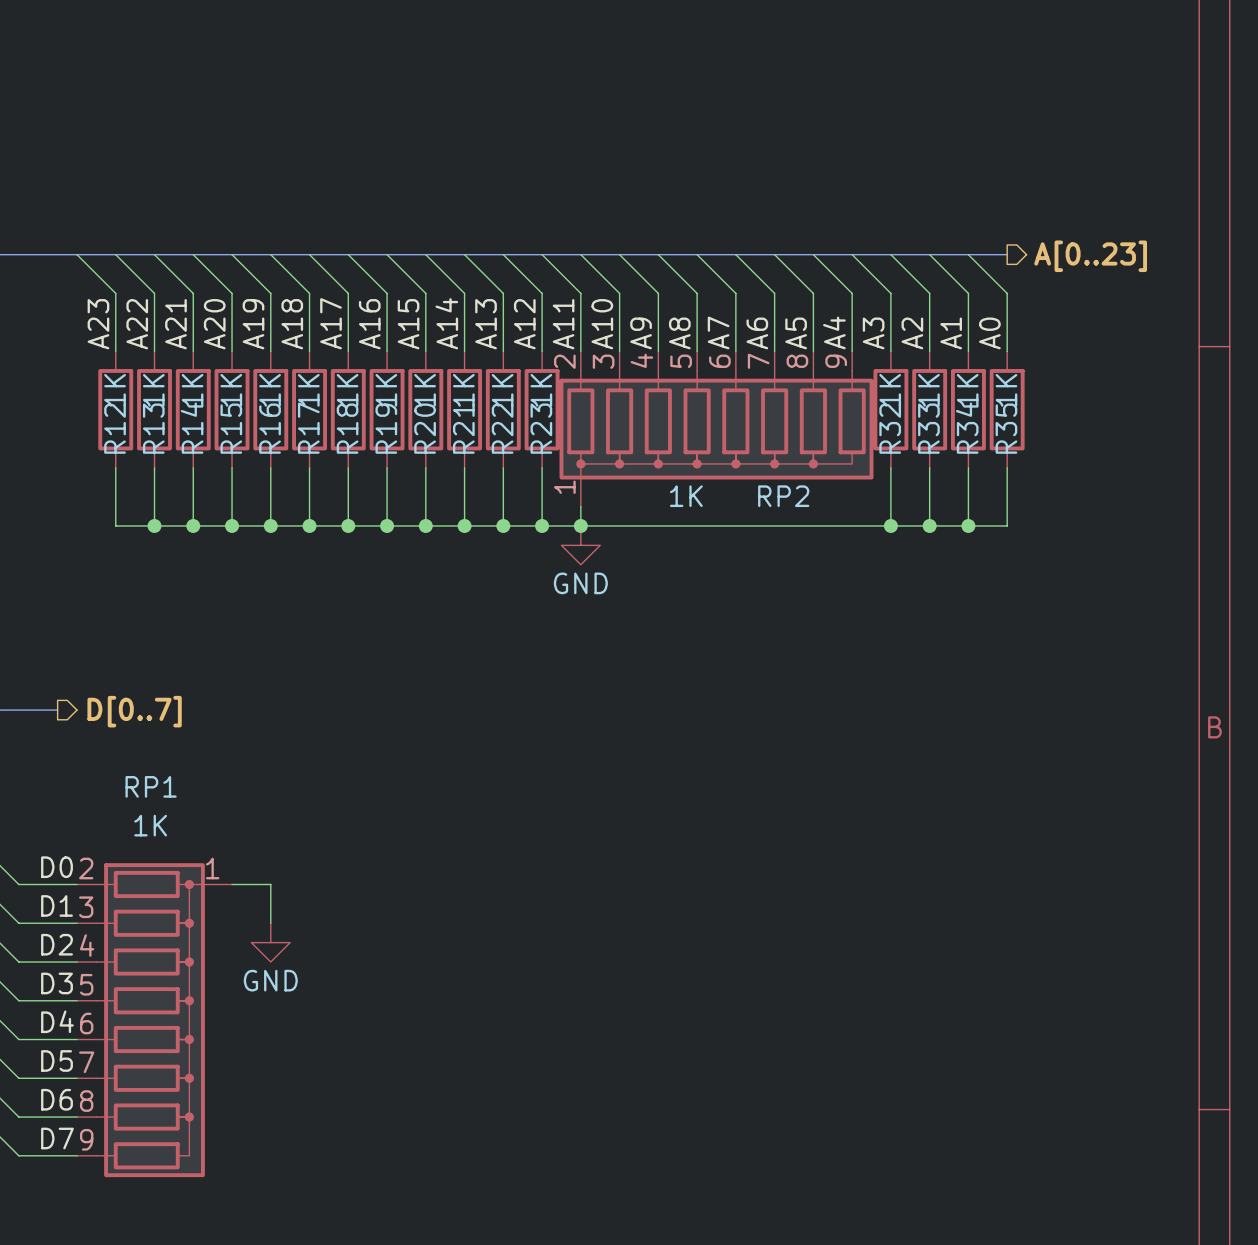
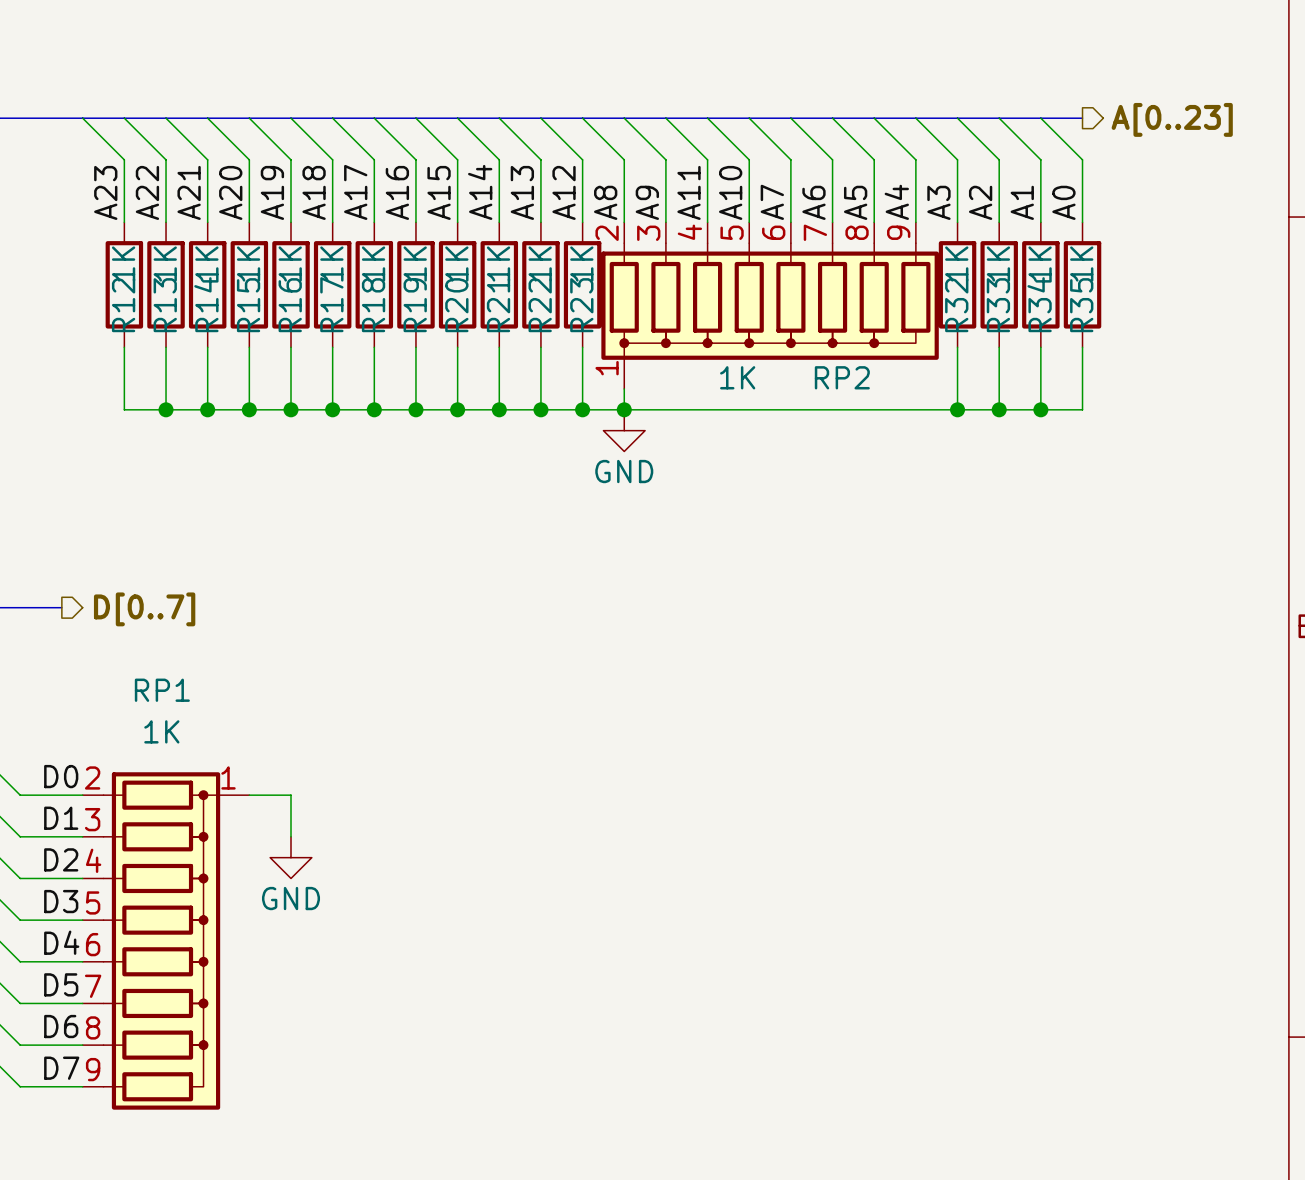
label: A11 (563, 324) -> A8 (605, 202)
label: A10 (602, 324) -> A9 (647, 202)
label: A9 (641, 333) -> A11 (689, 192)
label: A8 (679, 333) -> A10 (730, 192)

